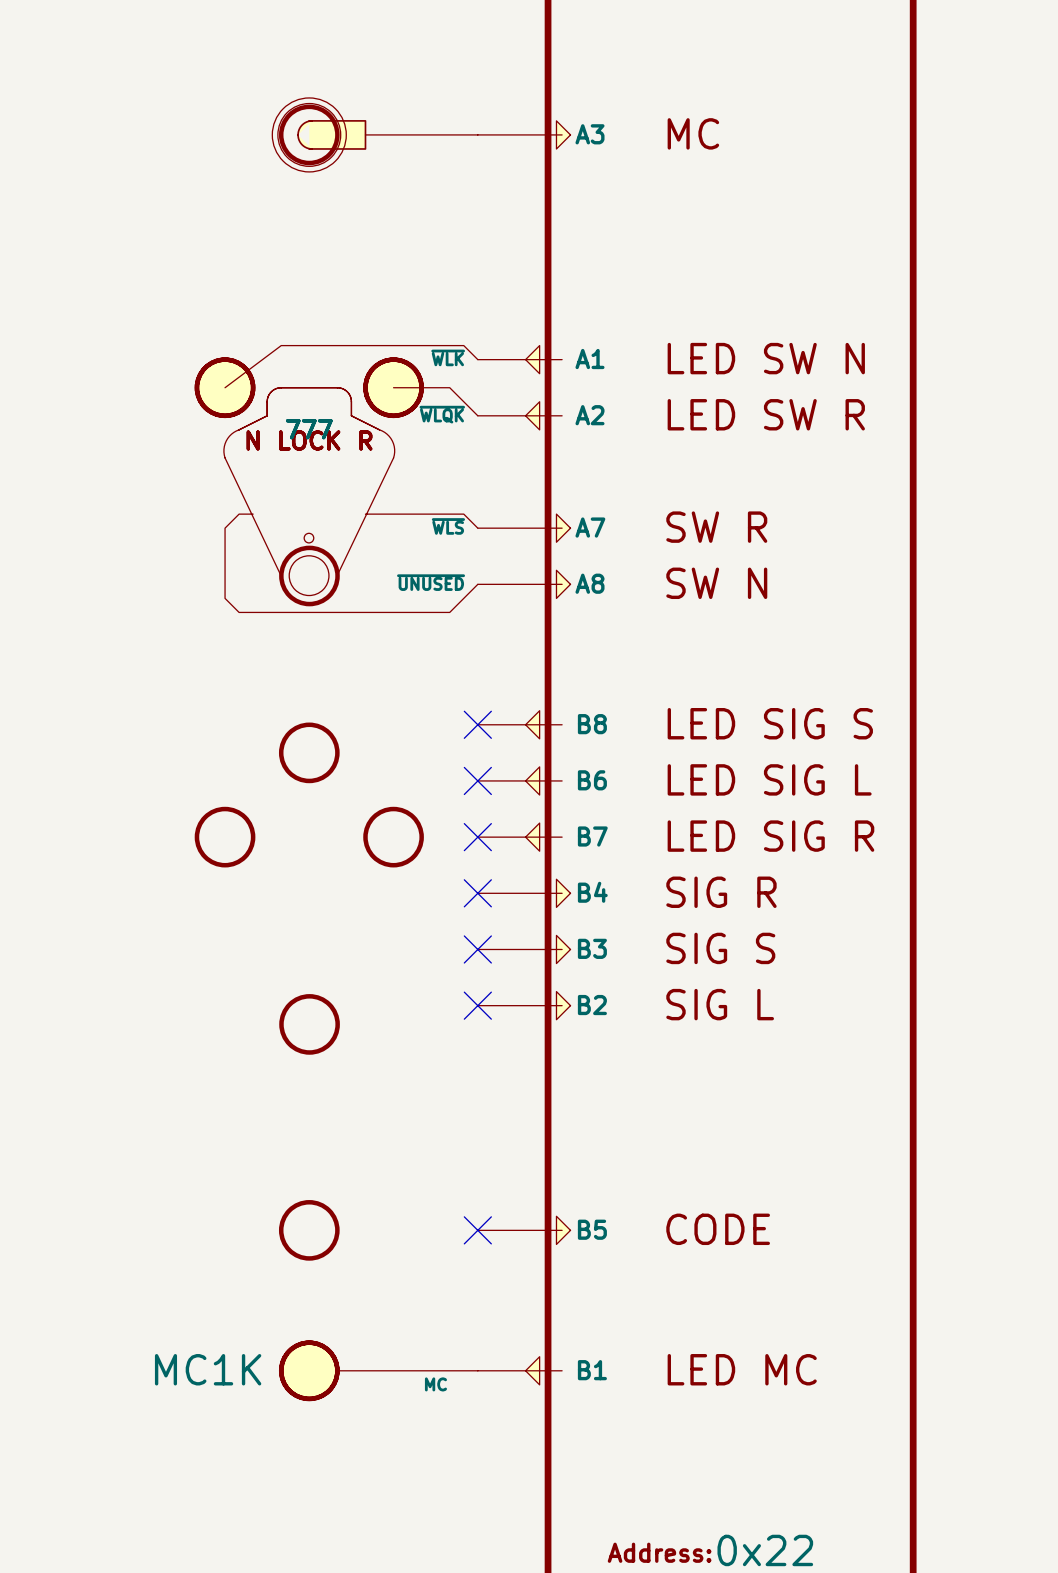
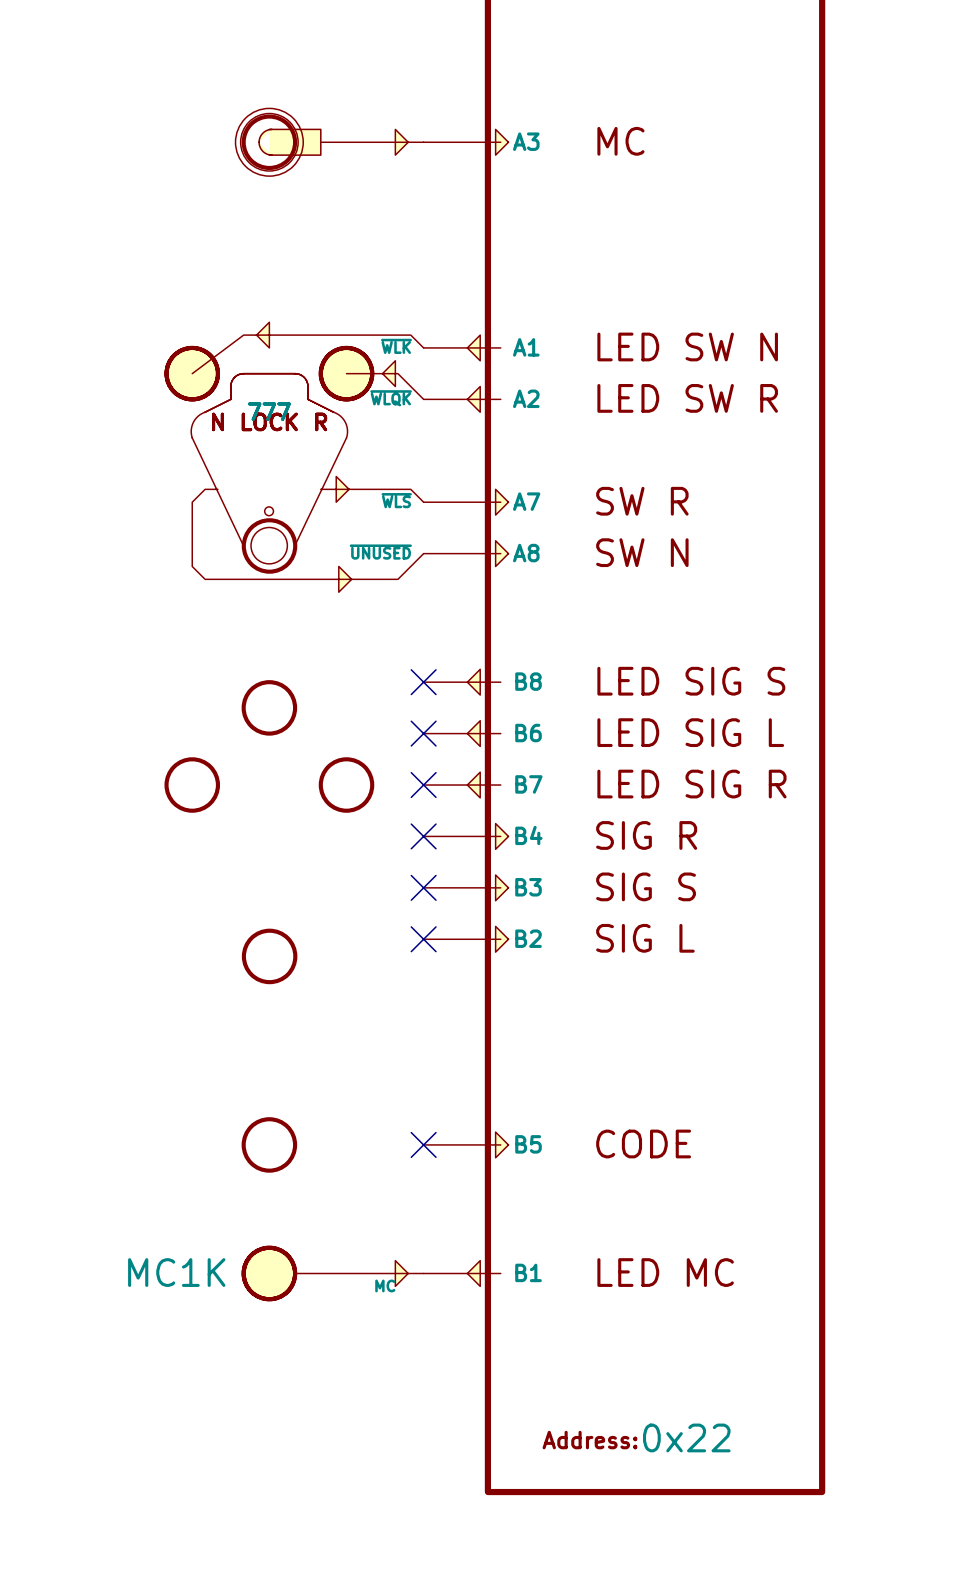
part symbol: [272, 97, 478, 172] -> [235, 108, 424, 177]
part symbol: [194, 345, 478, 430] -> [164, 322, 424, 413]
part symbol: [223, 387, 478, 613] -> [191, 373, 424, 593]
part symbol: [278, 1340, 478, 1402] -> [241, 1245, 424, 1302]

